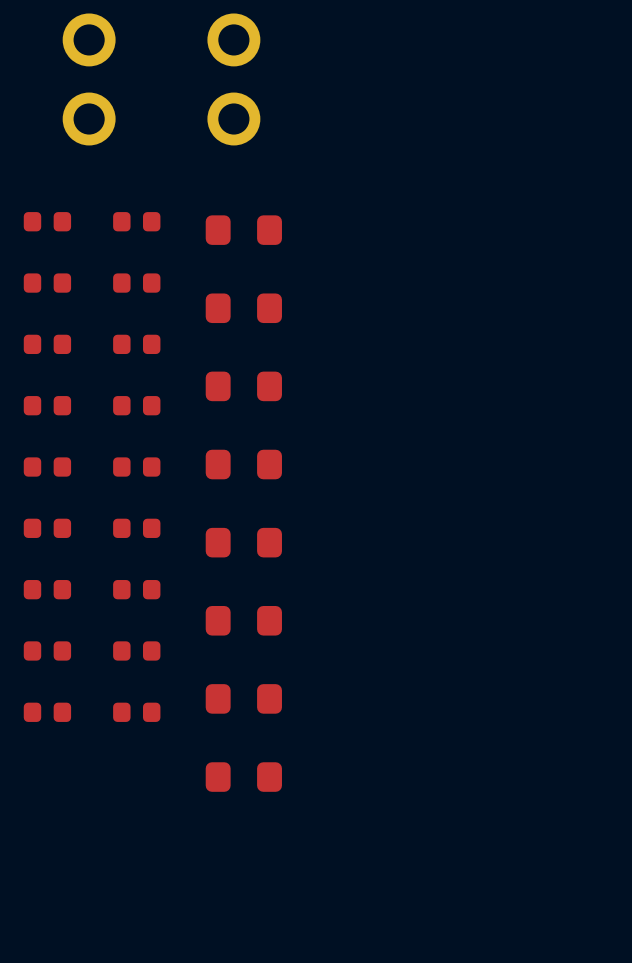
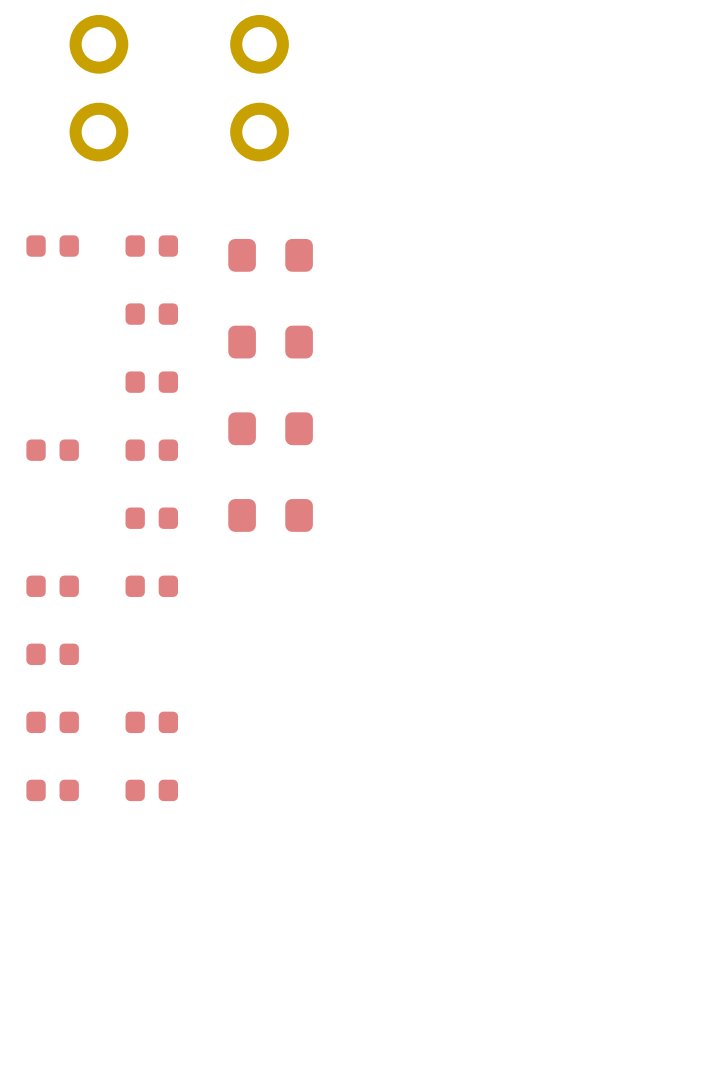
part: (47, 283) -> none
part: (47, 344) -> none
part: (47, 467) -> none
part: (243, 542) -> none
part: (136, 589) -> none
part: (243, 620) -> none
part: (243, 698) -> none
part: (243, 777) -> none

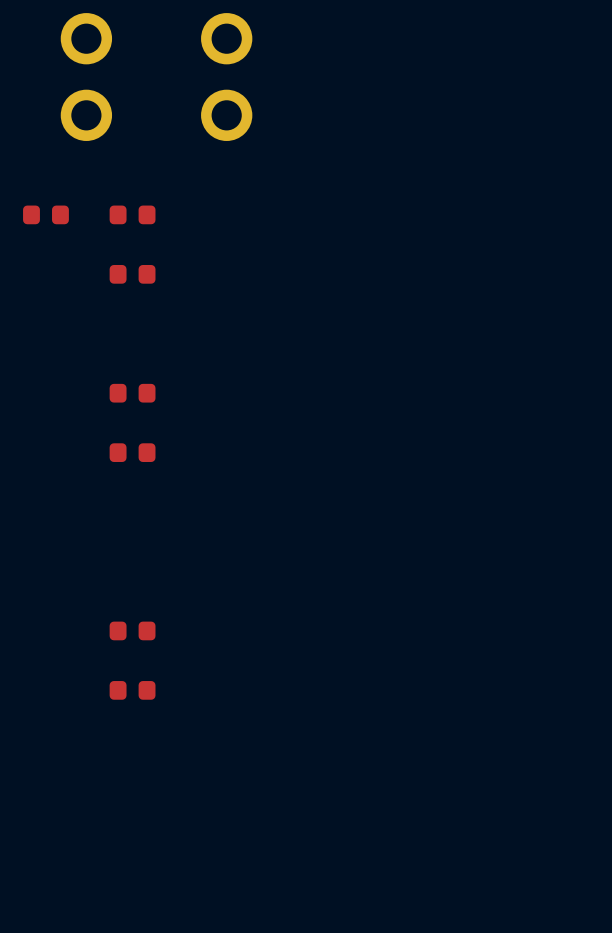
part: (270, 255) -> none
part: (270, 342) -> none
part: (151, 382) -> none
part: (270, 428) -> none
part: (52, 450) -> none
part: (270, 515) -> none
part: (52, 586) -> none
part: (151, 586) -> none
part: (52, 654) -> none
part: (52, 722) -> none
part: (52, 790) -> none

